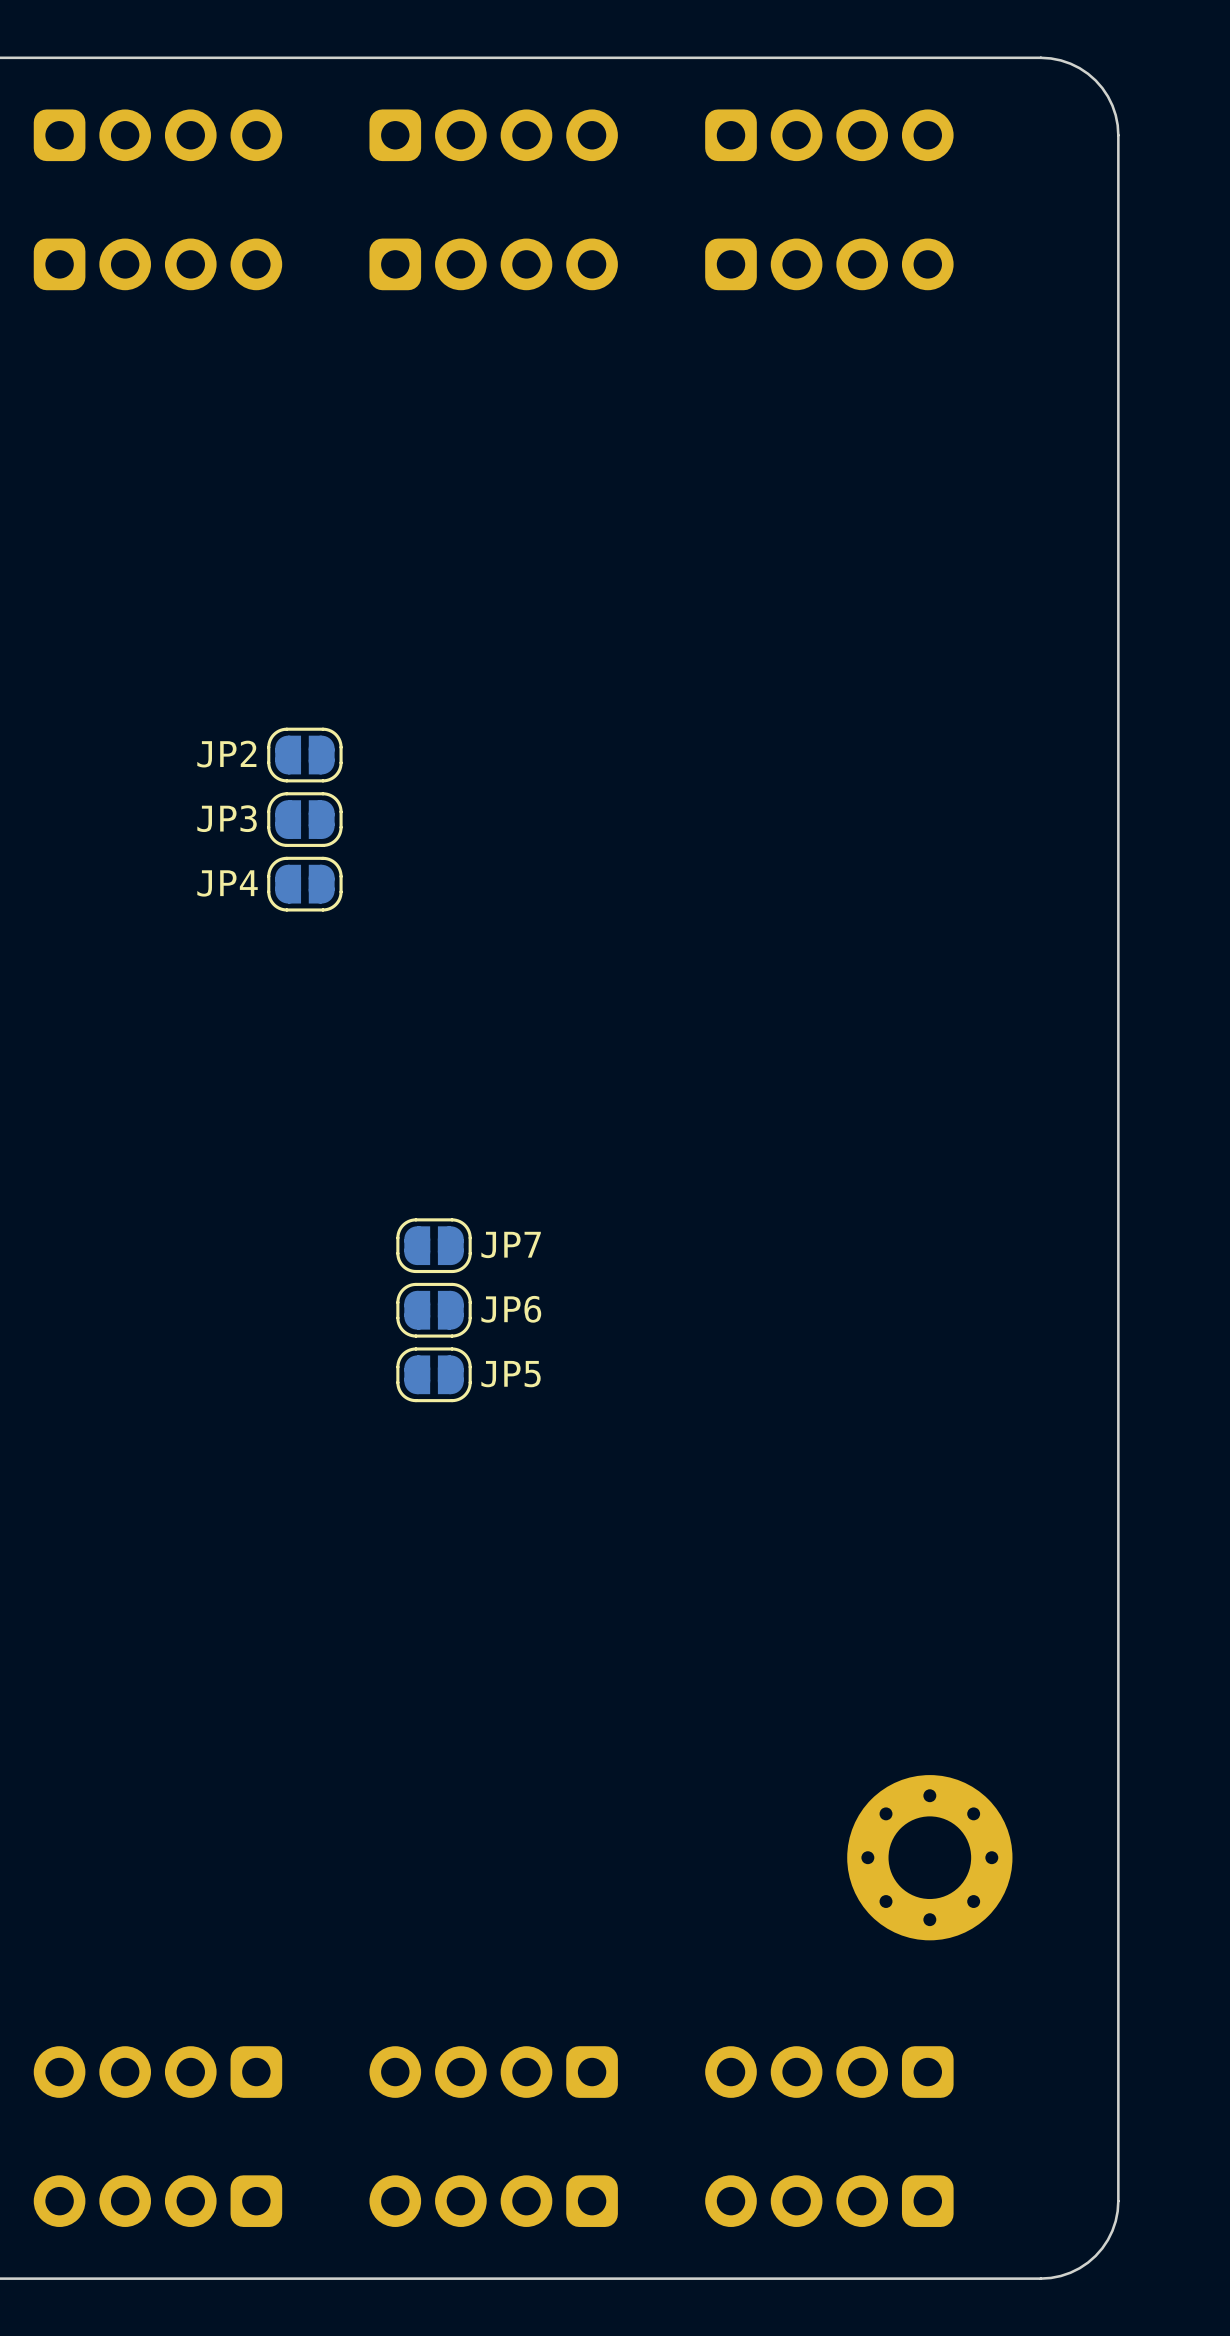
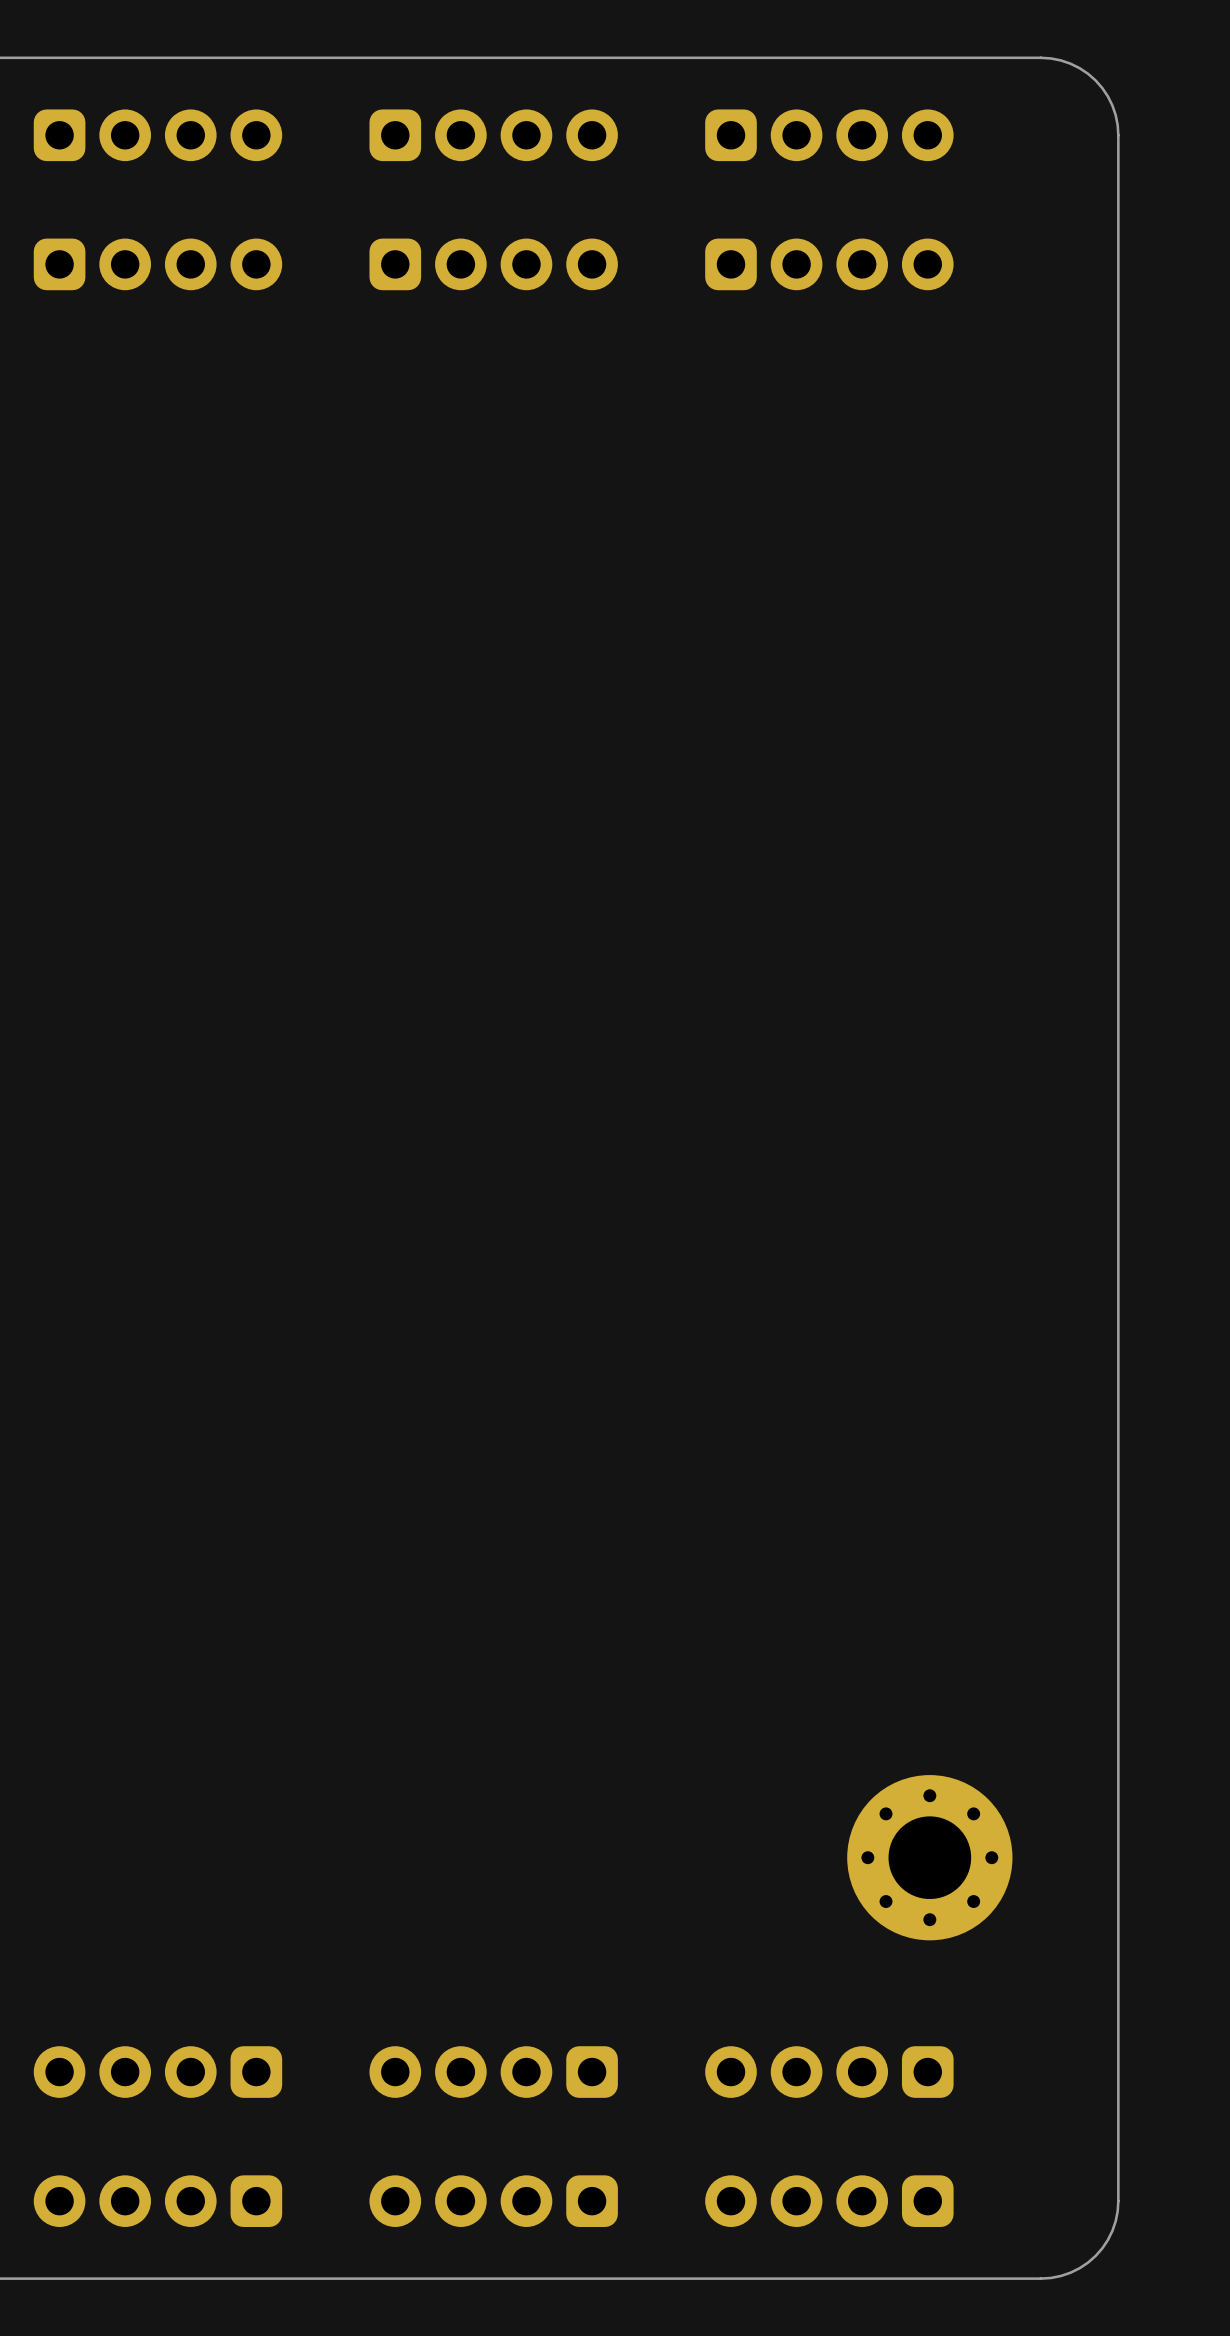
JP2: (304, 755) -> none
JP3: (304, 819) -> none
JP4: (304, 884) -> none
JP7: (434, 1245) -> none
JP6: (434, 1310) -> none
JP5: (434, 1374) -> none

